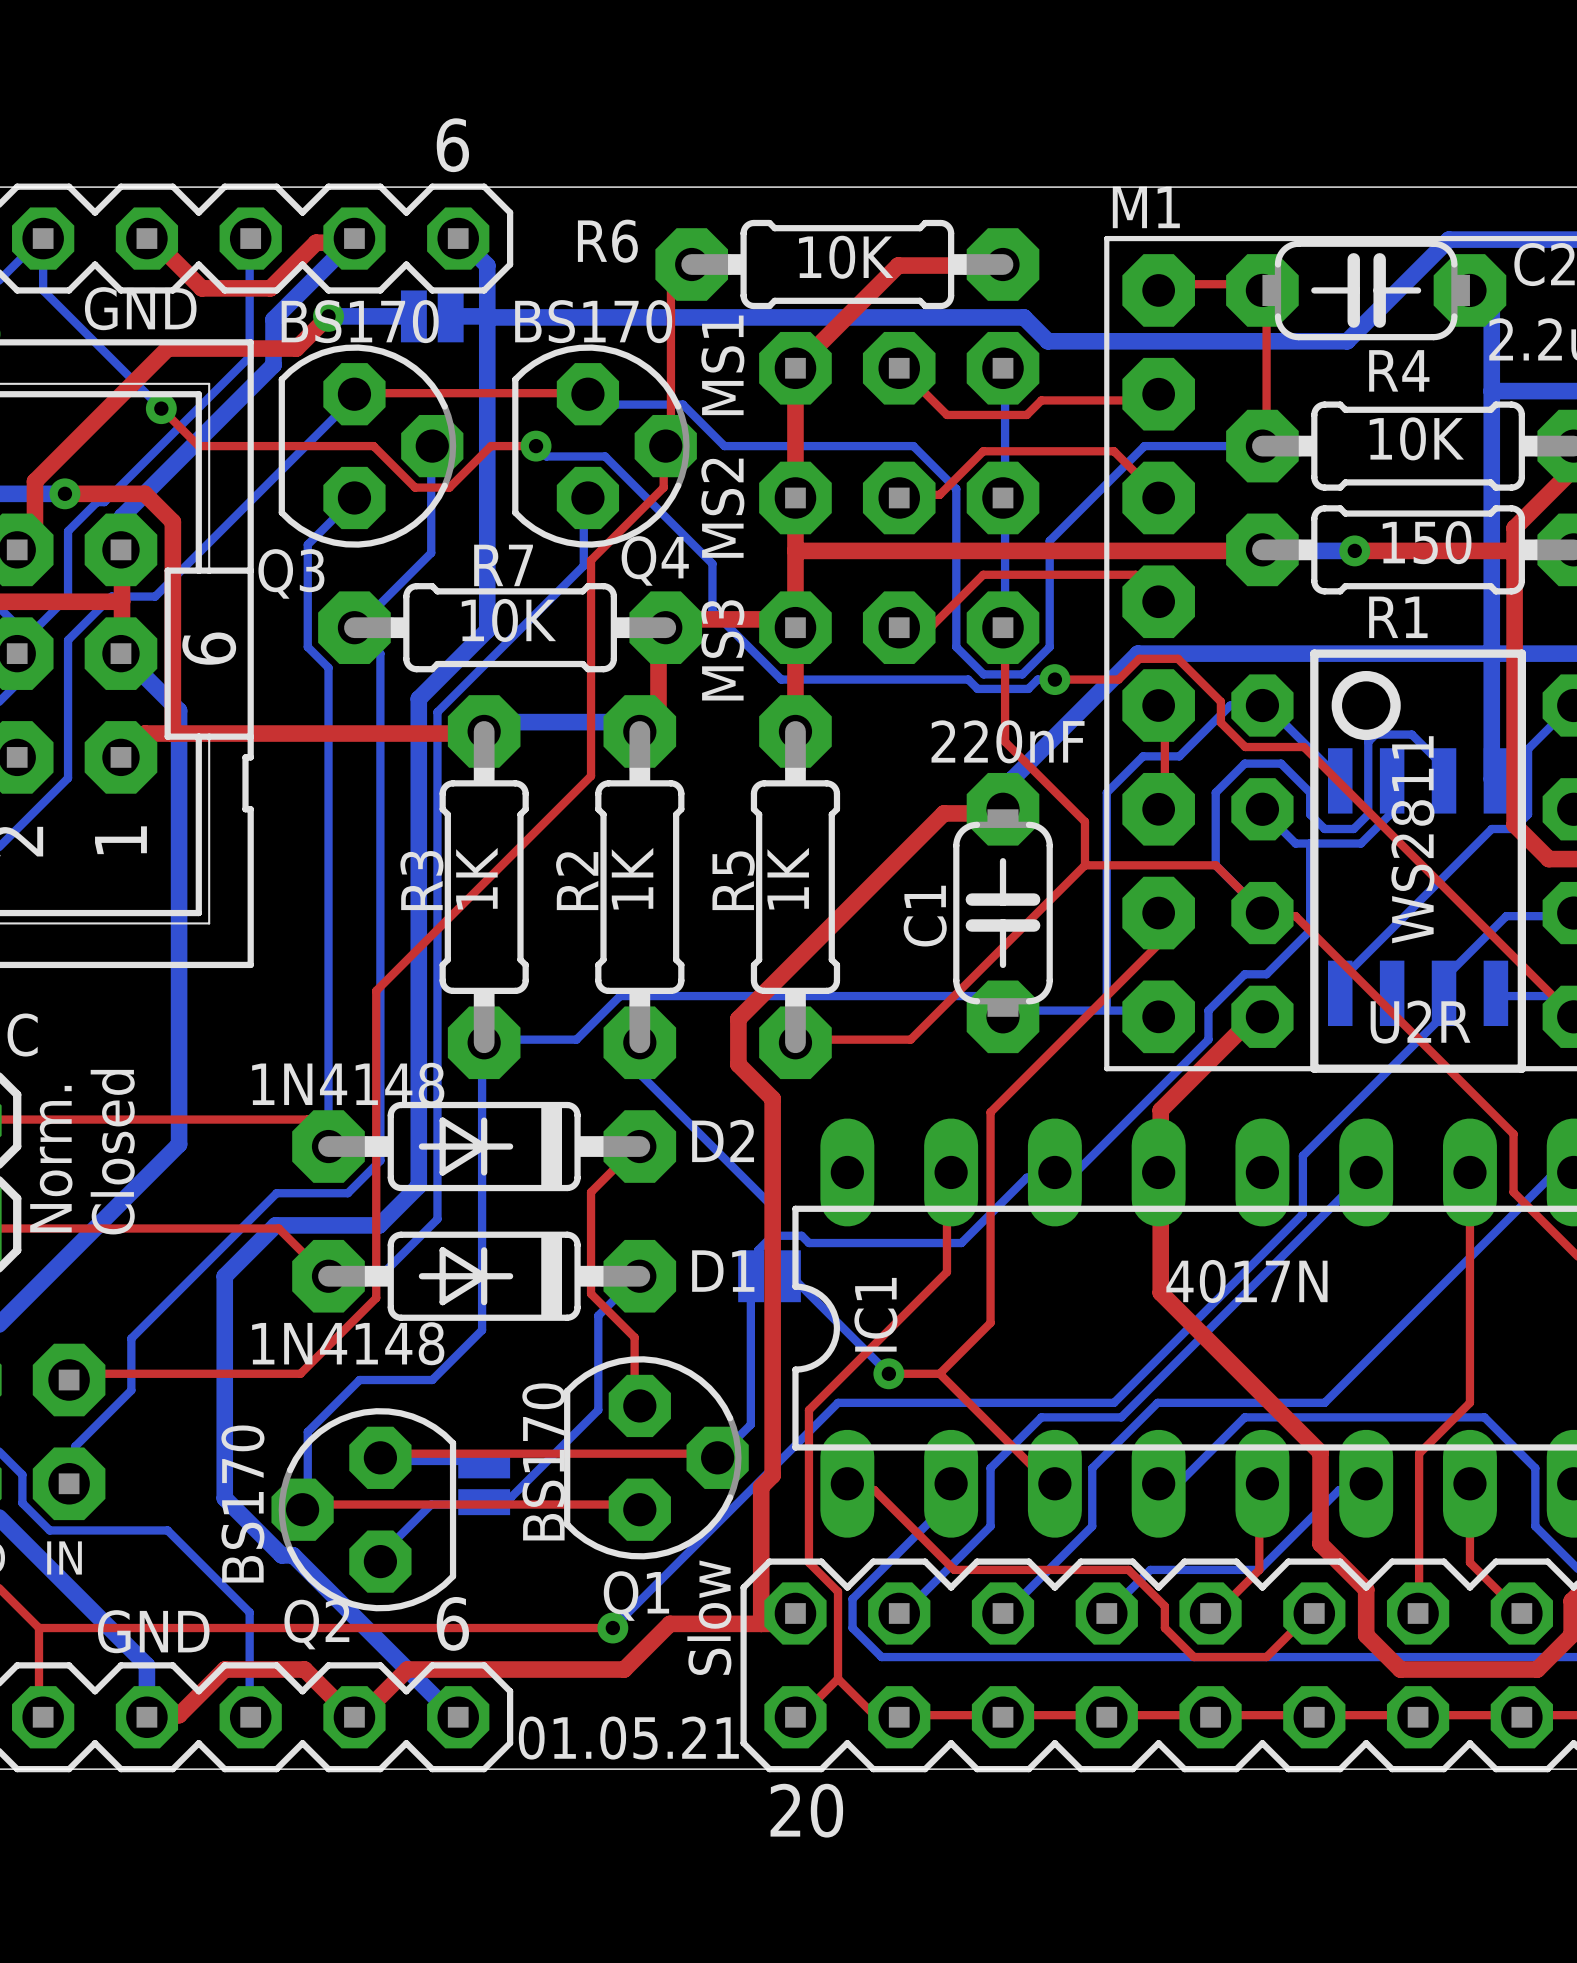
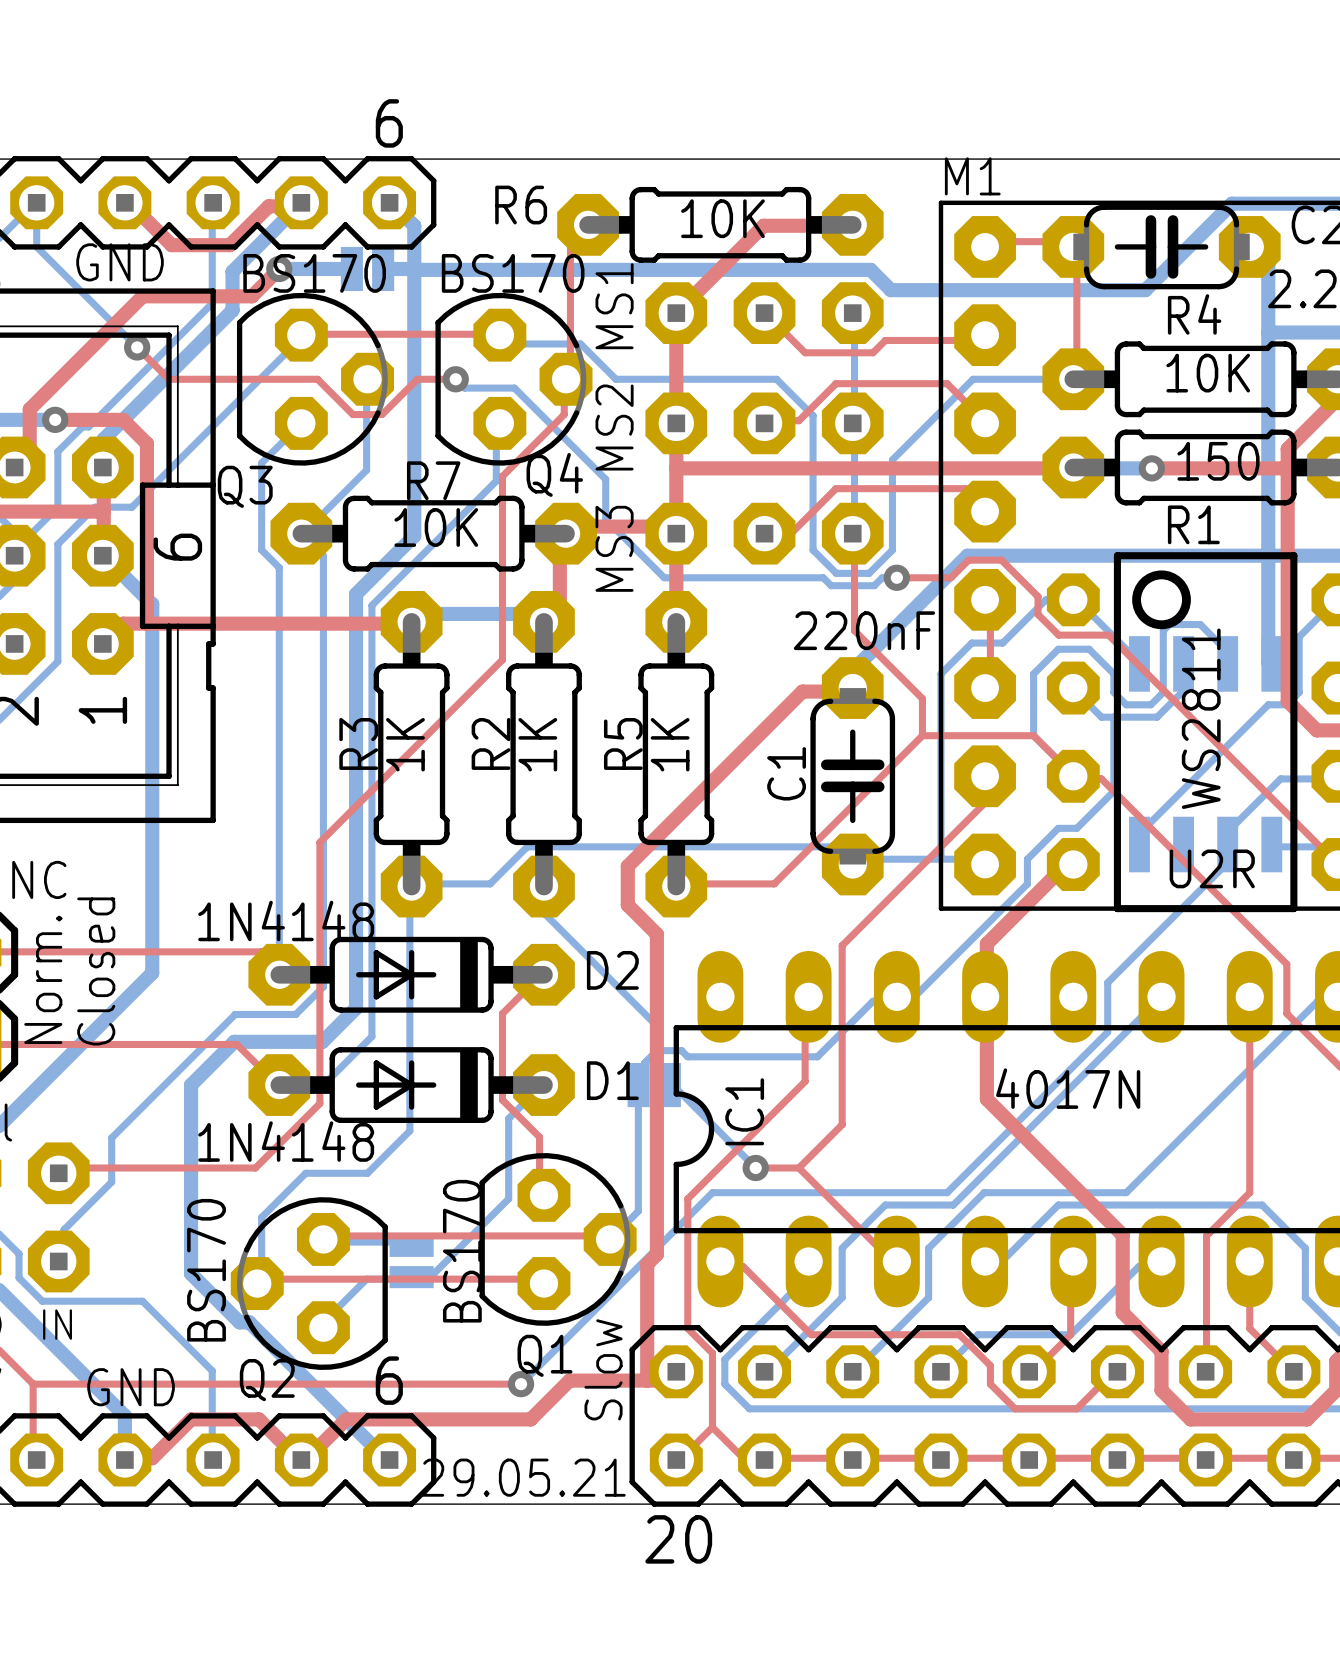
text: 01.05.21 (628, 1738) -> 29.05.21 (523, 1477)

